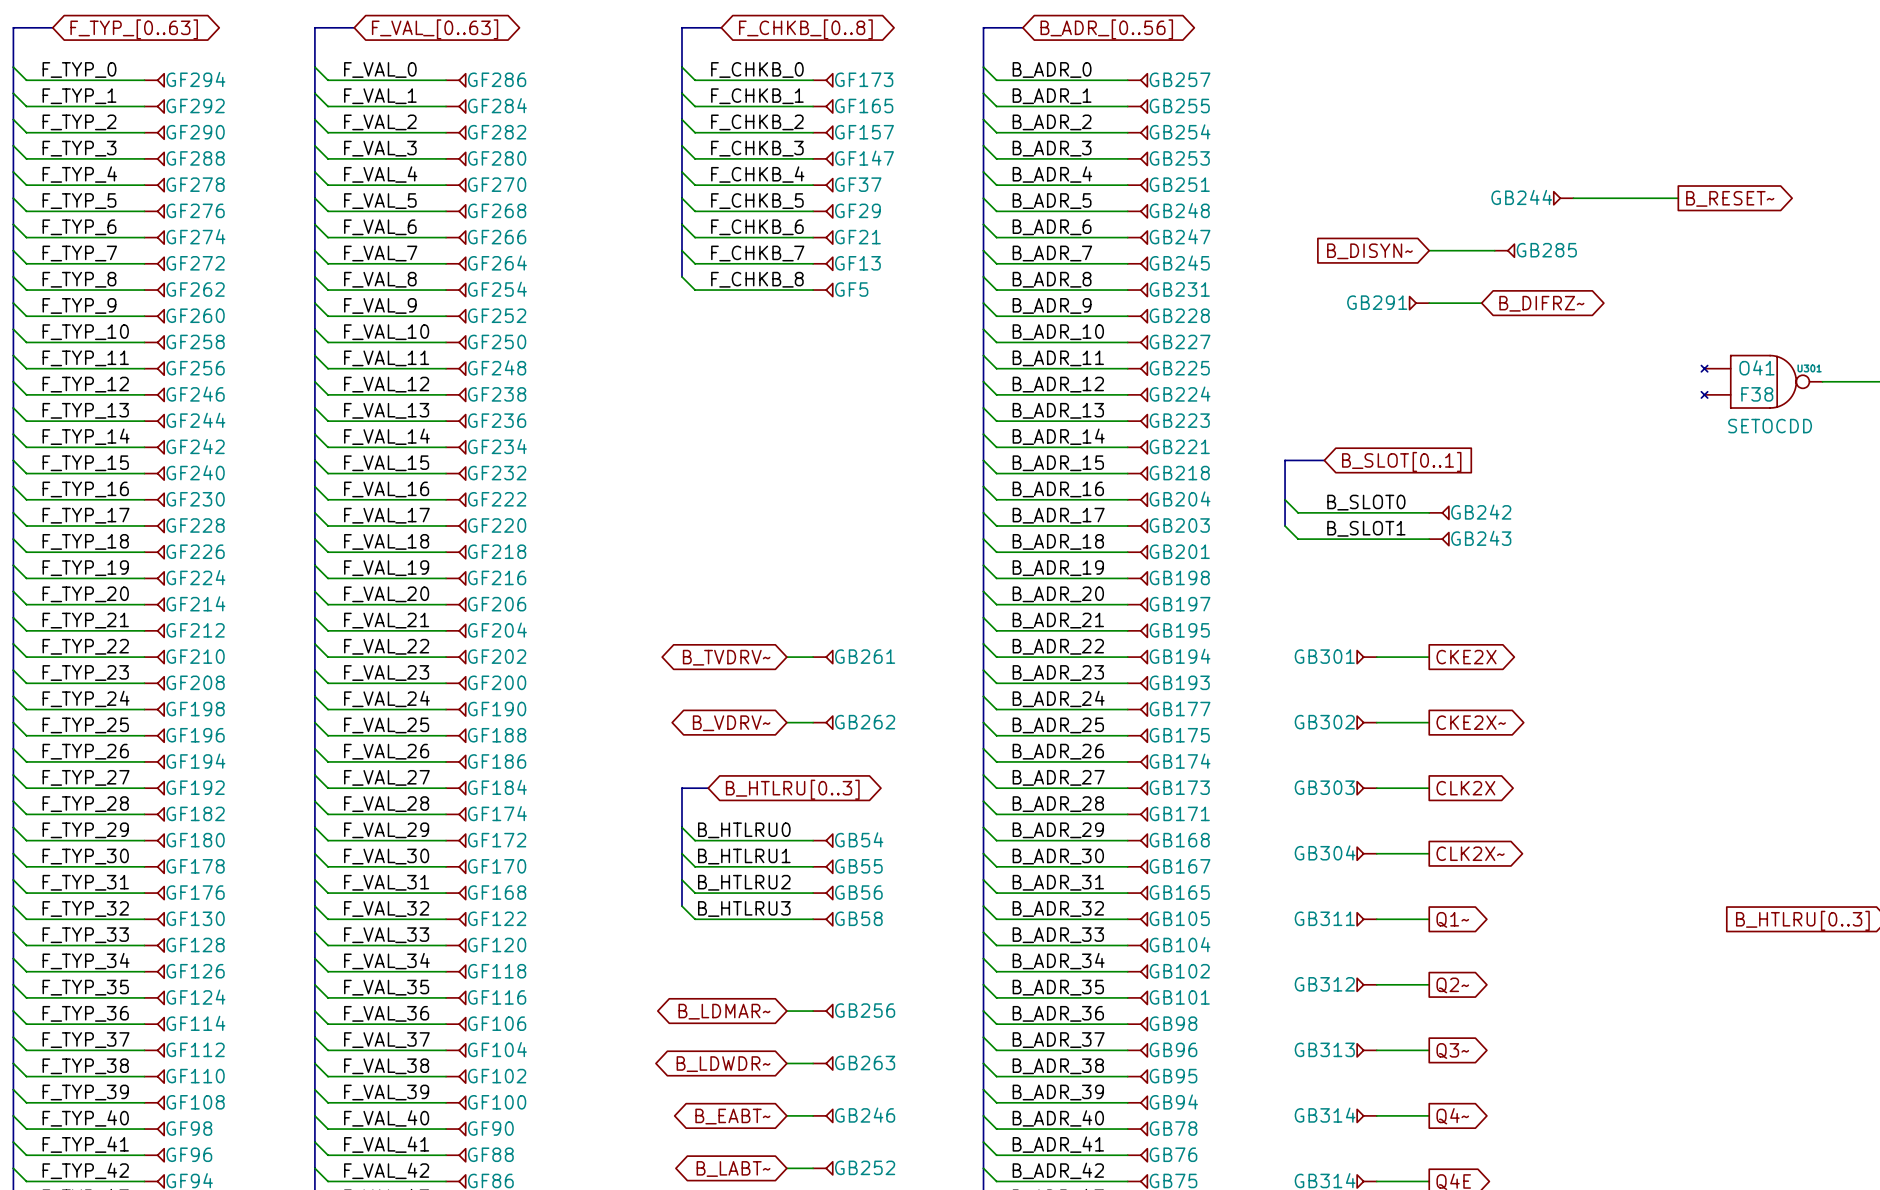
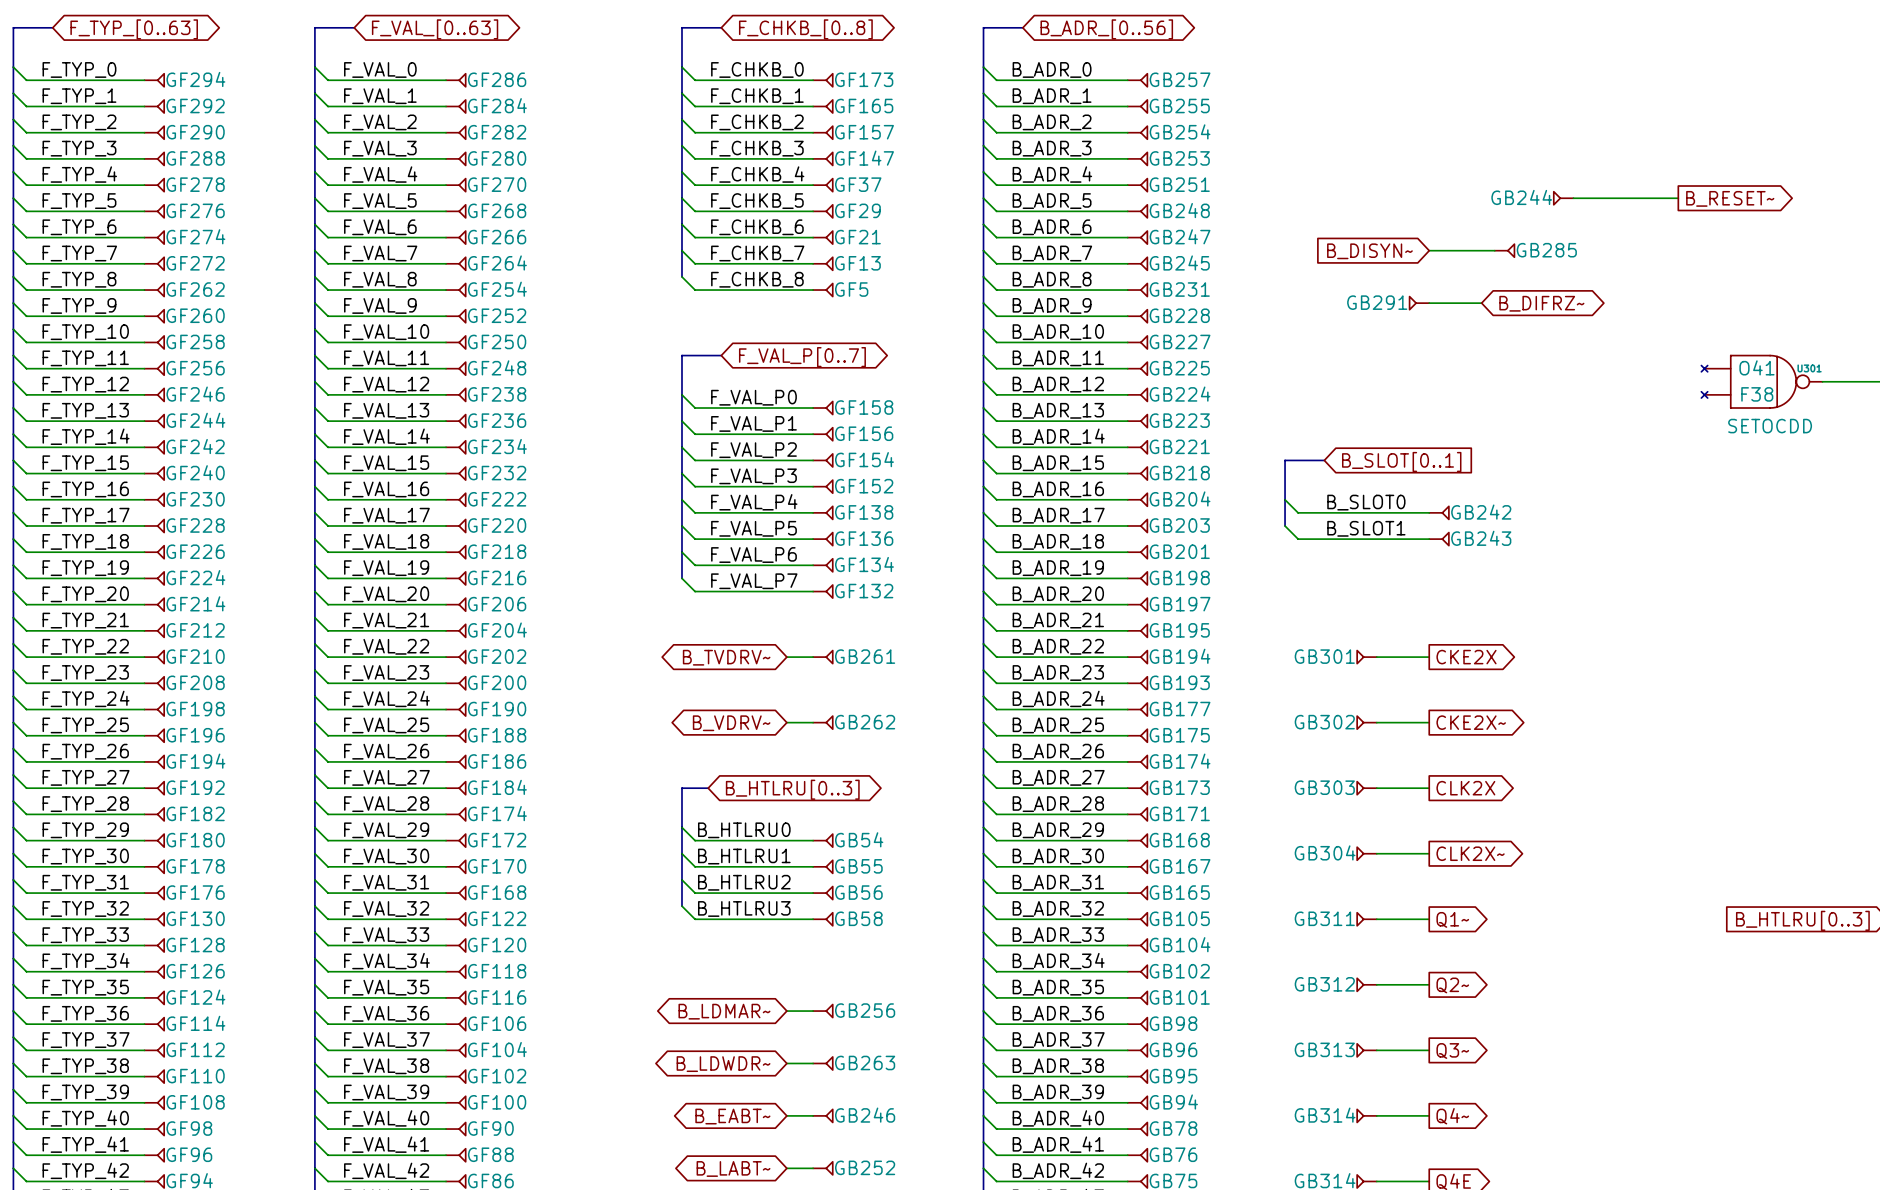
bus: none -> (721, 355) (681, 355) (681, 578)
global label: none -> F_VAL_P[0..7] (802, 357)
wire: none -> (681, 394) (695, 408) (813, 408)
label: none -> F_VAL_P0 (753, 397)
GF158: none -> (823, 408)
wire: none -> (681, 421) (695, 434) (813, 434)
label: none -> F_VAL_P1 (753, 423)
GF156: none -> (823, 434)
wire: none -> (681, 447) (695, 460) (813, 460)
label: none -> F_VAL_P2 (753, 450)
GF154: none -> (823, 460)
wire: none -> (681, 473) (695, 486) (813, 486)
label: none -> F_VAL_P3 (753, 476)
GF152: none -> (823, 486)
wire: none -> (681, 499) (695, 512) (813, 512)
label: none -> F_VAL_P4 (754, 502)
GF138: none -> (823, 512)
wire: none -> (681, 525) (695, 539) (813, 539)
label: none -> F_VAL_P5 (753, 528)
GF136: none -> (823, 539)
wire: none -> (681, 552) (695, 565) (813, 565)
label: none -> F_VAL_P6 (753, 555)
GF134: none -> (823, 565)
wire: none -> (681, 578) (695, 591) (813, 591)
label: none -> F_VAL_P7 (754, 581)
GF132: none -> (823, 591)

